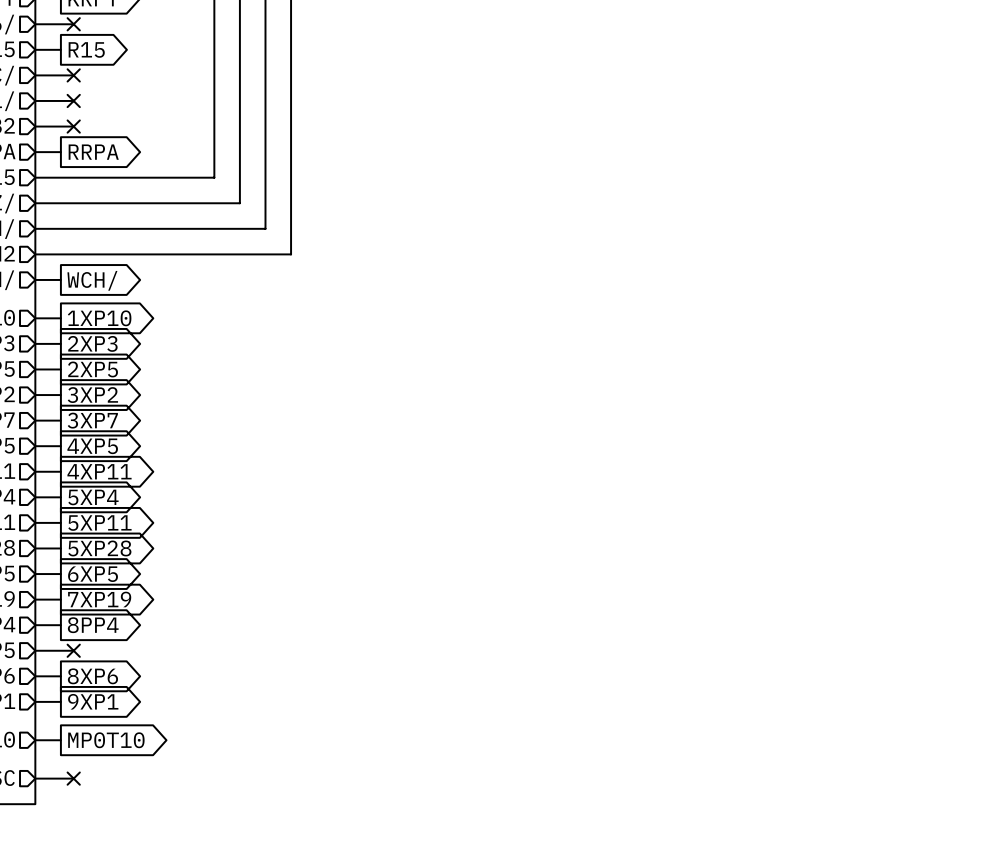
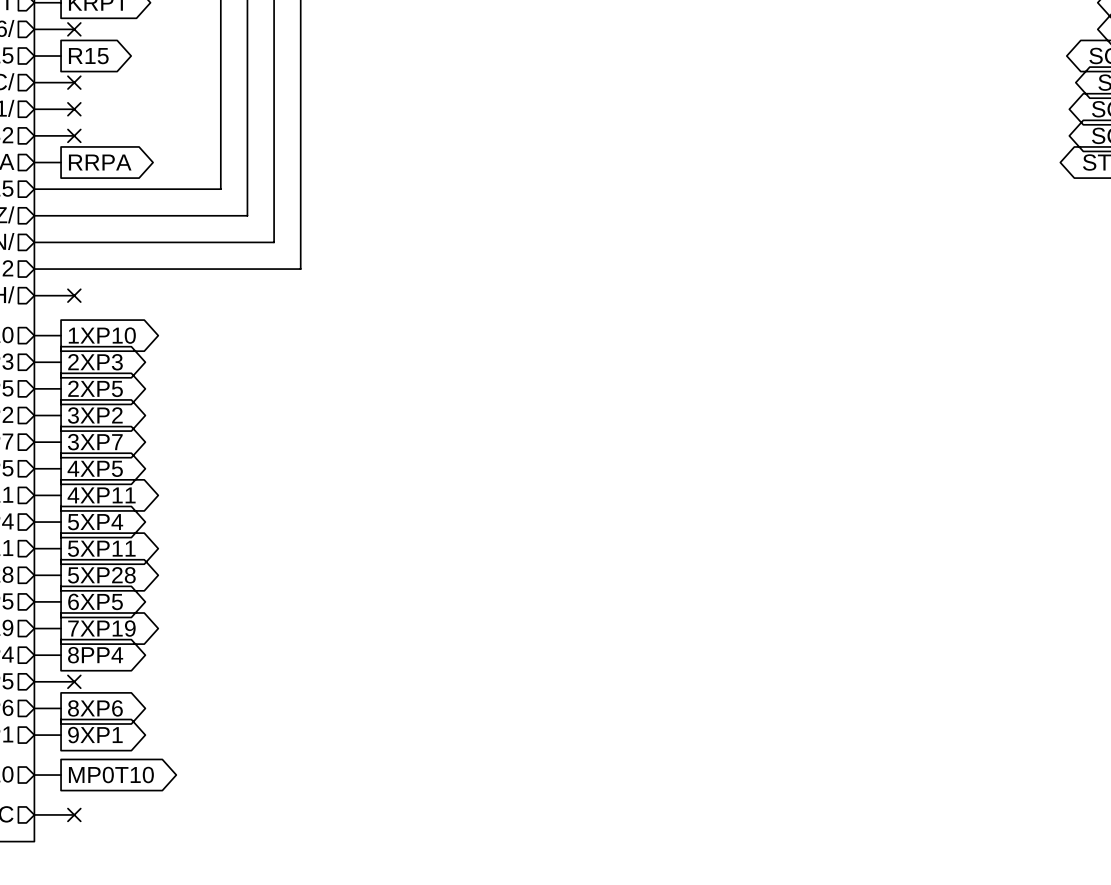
wire: none -> (61, 295) (74, 295)
no-connect mark: none -> (74, 295)
global label: WCH/ (92, 280) -> none

